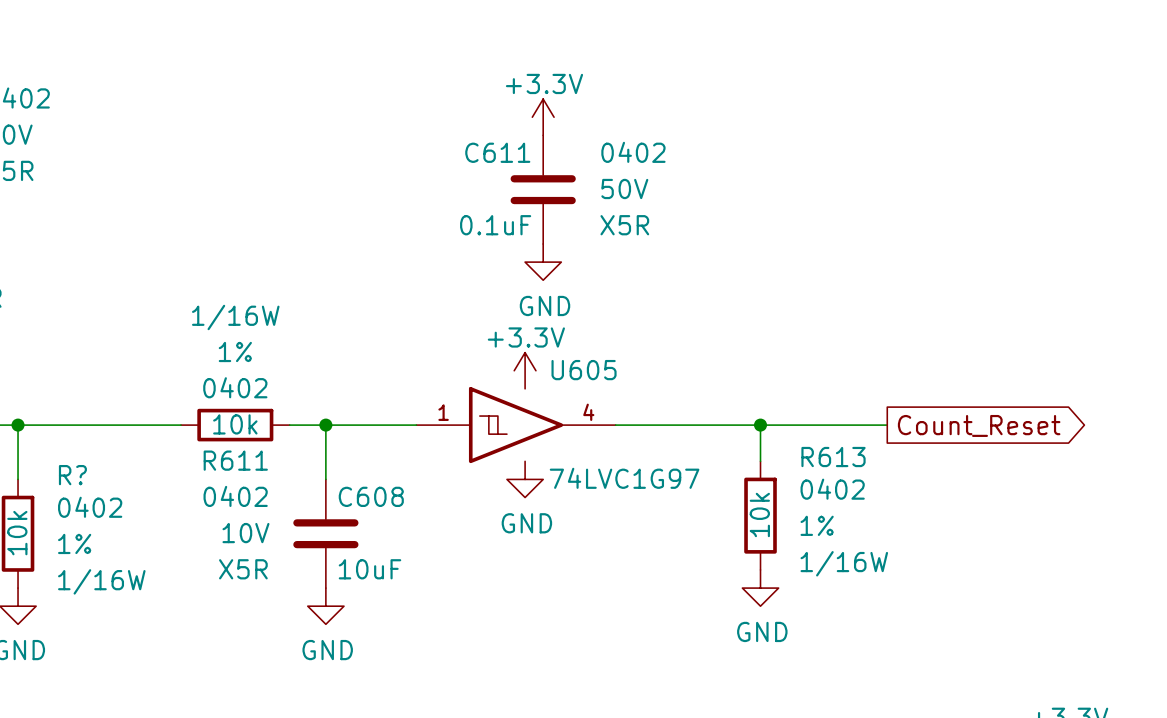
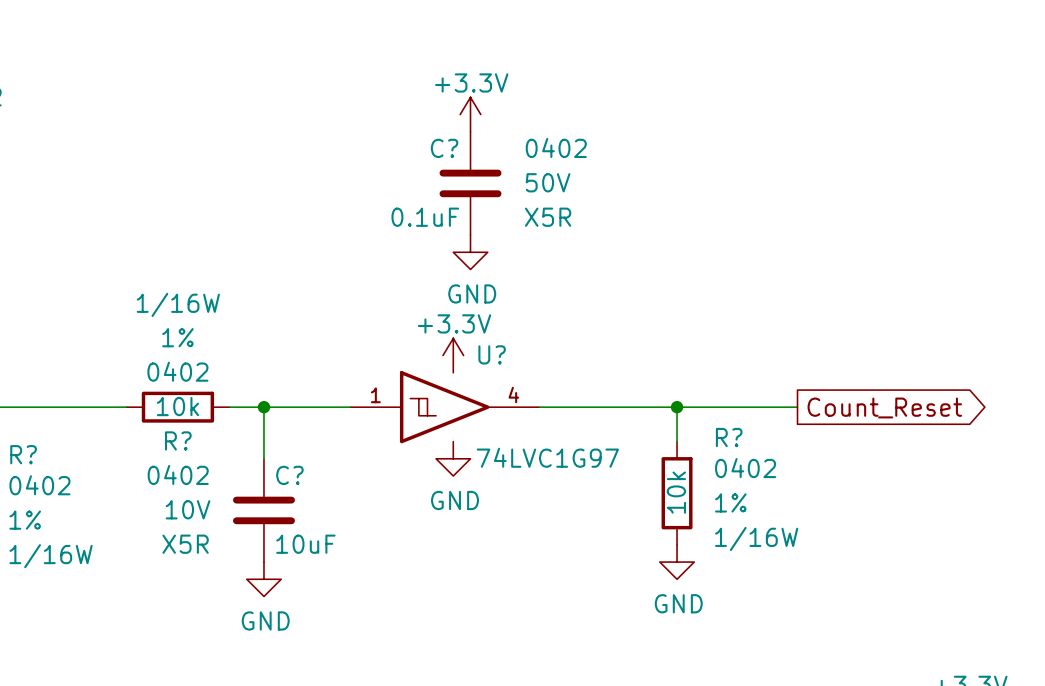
C611 name: C611 (497, 152) -> C? (444, 148)
U605 name: U605 (584, 370) -> U? (492, 354)
R613 name: R613 (833, 457) -> R? (729, 437)
R611 name: R611 (235, 460) -> R? (178, 440)
C608 name: C608 (371, 496) -> C? (289, 475)

